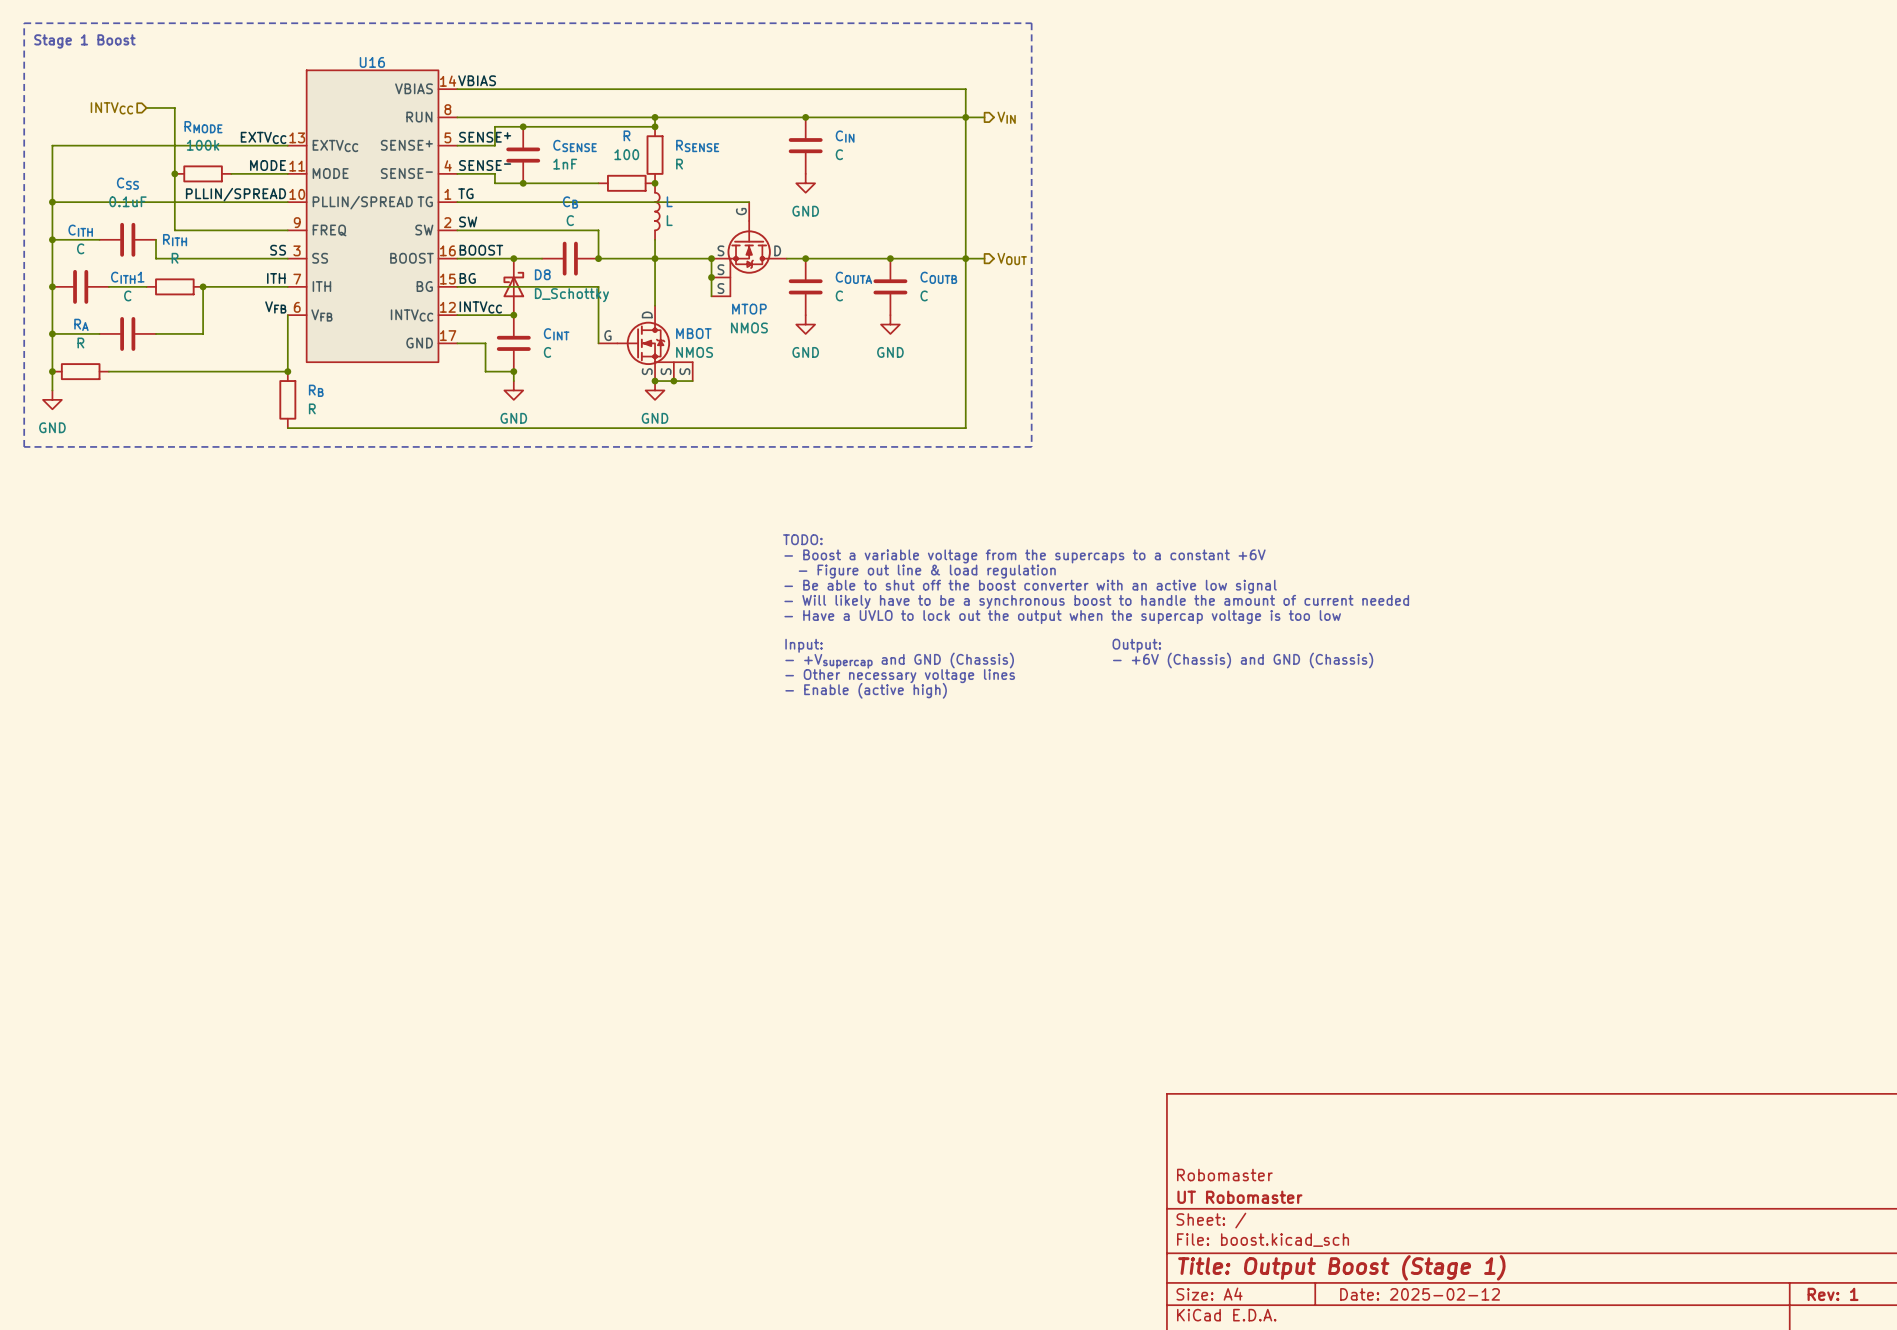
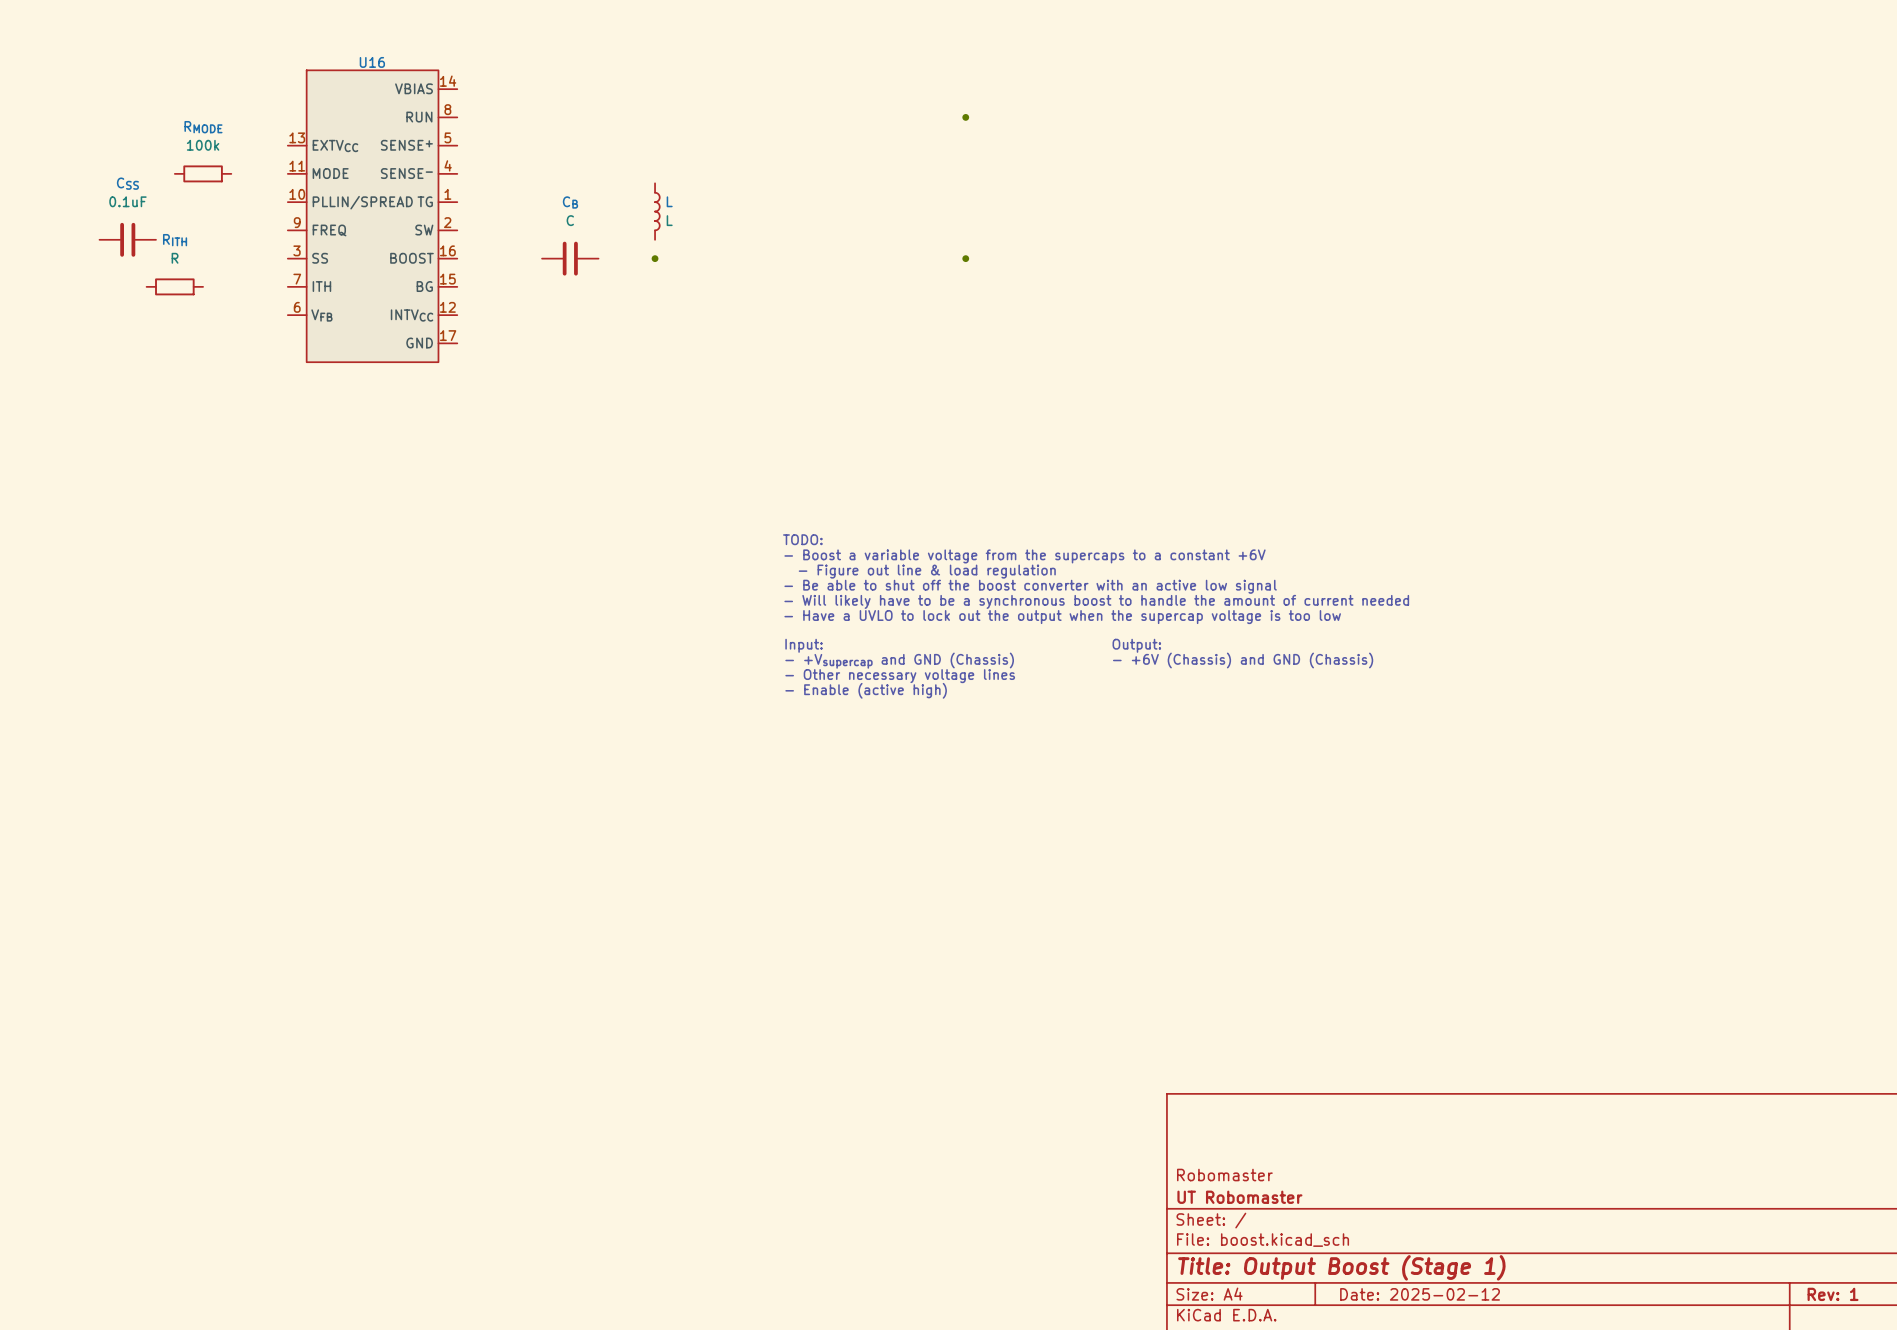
line: (24, 23) (1031, 23) (1031, 446) (24, 446) (24, 23) -> none
text: Stage 1 Boost (84, 41) -> none
label: VBIAS (477, 80) -> none
wire: (457, 89) (965, 89) (965, 428) (287, 428) -> none
wire: (146, 107) (174, 107) (174, 230) (287, 230) -> none
hierarchical label: INTVCC (111, 108) -> none
wire: (457, 117) (984, 117) -> none
wire: (655, 117) (655, 126) (494, 126) (494, 145) (457, 145) -> none
junction: (655, 117) -> none
junction: (805, 117) -> none
hierarchical label: VIN (1006, 117) -> none
junction: (523, 126) -> none
junction: (655, 126) -> none
label: EXTVCC (263, 137) -> none
label: SENSE+ (485, 137) -> none
wire: (287, 145) (52, 145) (52, 390) -> none
CIN: C (805, 145) -> none
CSENSE: 1nF (523, 155) -> none
RSENSE: R (655, 155) -> none
label: MODE (268, 165) -> none
label: SENSE- (485, 165) -> none
junction: (174, 173) -> none
wire: (231, 173) (287, 173) -> none
wire: (457, 173) (494, 173) (494, 183) (598, 183) -> none
junction: (523, 183) -> none
R: 100 (626, 183) -> none
junction: (655, 183) -> none
power symbol: GND (805, 183) -> none
label: TG (465, 193) -> none
label: PLLIN/SPREAD (235, 194) -> none
wire: (52, 202) (287, 202) -> none
junction: (52, 202) -> none
wire: (457, 202) (749, 202) -> none
label: SW (468, 221) -> none
wire: (457, 230) (598, 230) (598, 258) (711, 258) (711, 296) -> none
wire: (52, 239) (99, 239) -> none
junction: (52, 239) -> none
wire: (156, 239) (156, 258) (287, 258) -> none
wire: (655, 239) (655, 305) -> none
MTOP: NMOS (749, 249) -> none
label: SS (278, 250) -> none
label: BOOST (481, 250) -> none
wire: (457, 258) (542, 258) -> none
junction: (513, 258) -> none
junction: (598, 258) -> none
junction: (711, 258) -> none
wire: (786, 258) (984, 258) -> none
junction: (805, 258) -> none
junction: (890, 258) -> none
hierarchical label: VOUT (1012, 258) -> none
junction: (711, 277) -> none
label: ITH (276, 278) -> none
label: BG (467, 278) -> none
junction: (52, 286) -> none
CITH: C (80, 286) -> none
wire: (108, 286) (146, 286) -> none
junction: (203, 286) -> none
wire: (287, 286) (203, 286) (203, 333) (156, 333) -> none
wire: (457, 286) (598, 286) (598, 343) -> none
D8: D_Schottky (513, 286) -> none
COUTA: C (805, 286) -> none
COUTB: C (890, 286) -> none
label: VFB (275, 307) -> none
label: INTVCC (480, 307) -> none
wire: (287, 315) (287, 371) (108, 371) -> none
wire: (457, 315) (513, 315) -> none
junction: (513, 315) -> none
power symbol: GND (805, 324) -> none
power symbol: GND (890, 324) -> none
wire: (52, 333) (99, 333) -> none
junction: (52, 333) -> none
CITH1: C (127, 333) -> none
wire: (457, 343) (485, 343) (485, 371) (513, 371) (513, 381) -> none
CINT: C (513, 343) -> none
MBOT: NMOS (645, 343) -> none
junction: (52, 371) -> none
RA: R (80, 371) -> none
junction: (287, 371) -> none
junction: (513, 371) -> none
wire: (655, 381) (692, 381) -> none
junction: (655, 381) -> none
junction: (673, 381) -> none
power symbol: GND (513, 390) -> none
power symbol: GND (655, 390) -> none
power symbol: GND (52, 399) -> none
RB: R (287, 399) -> none

